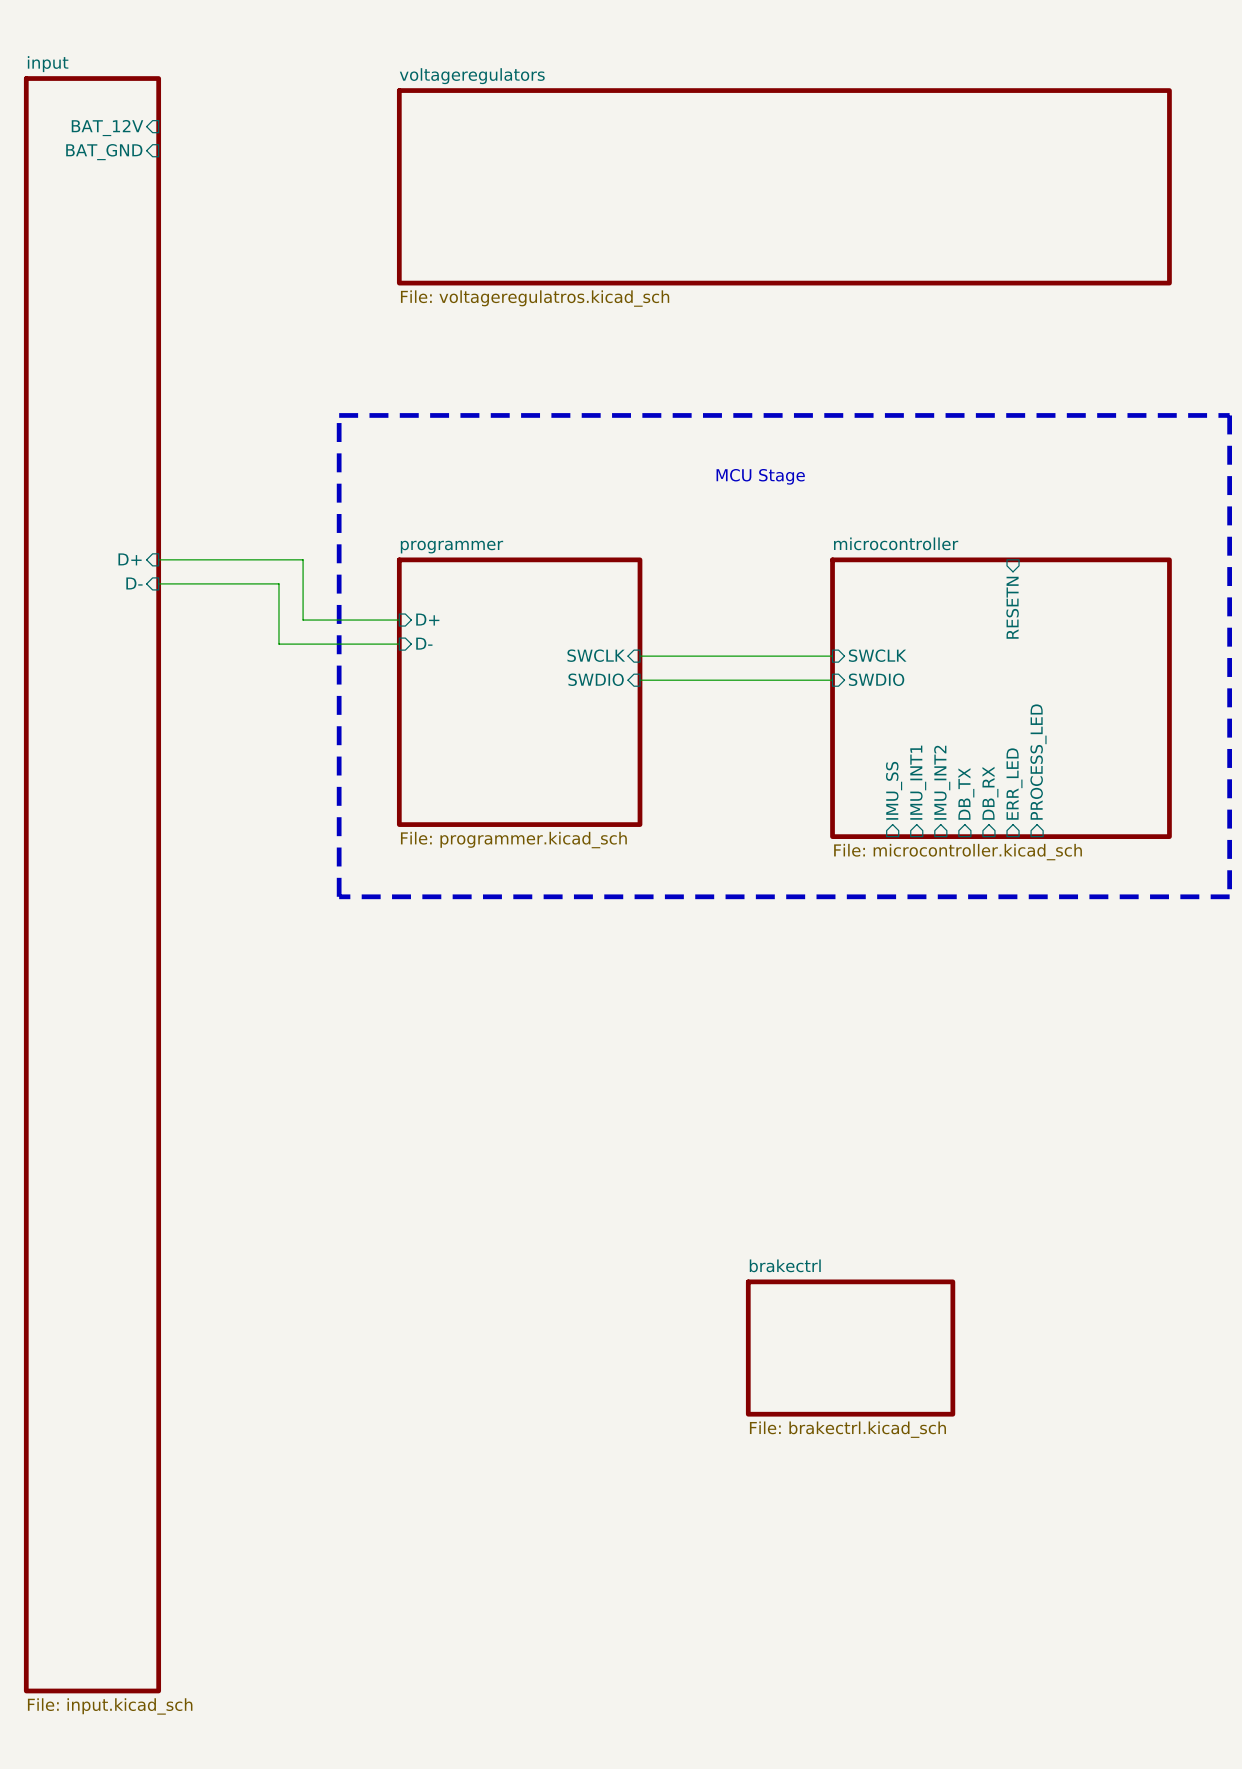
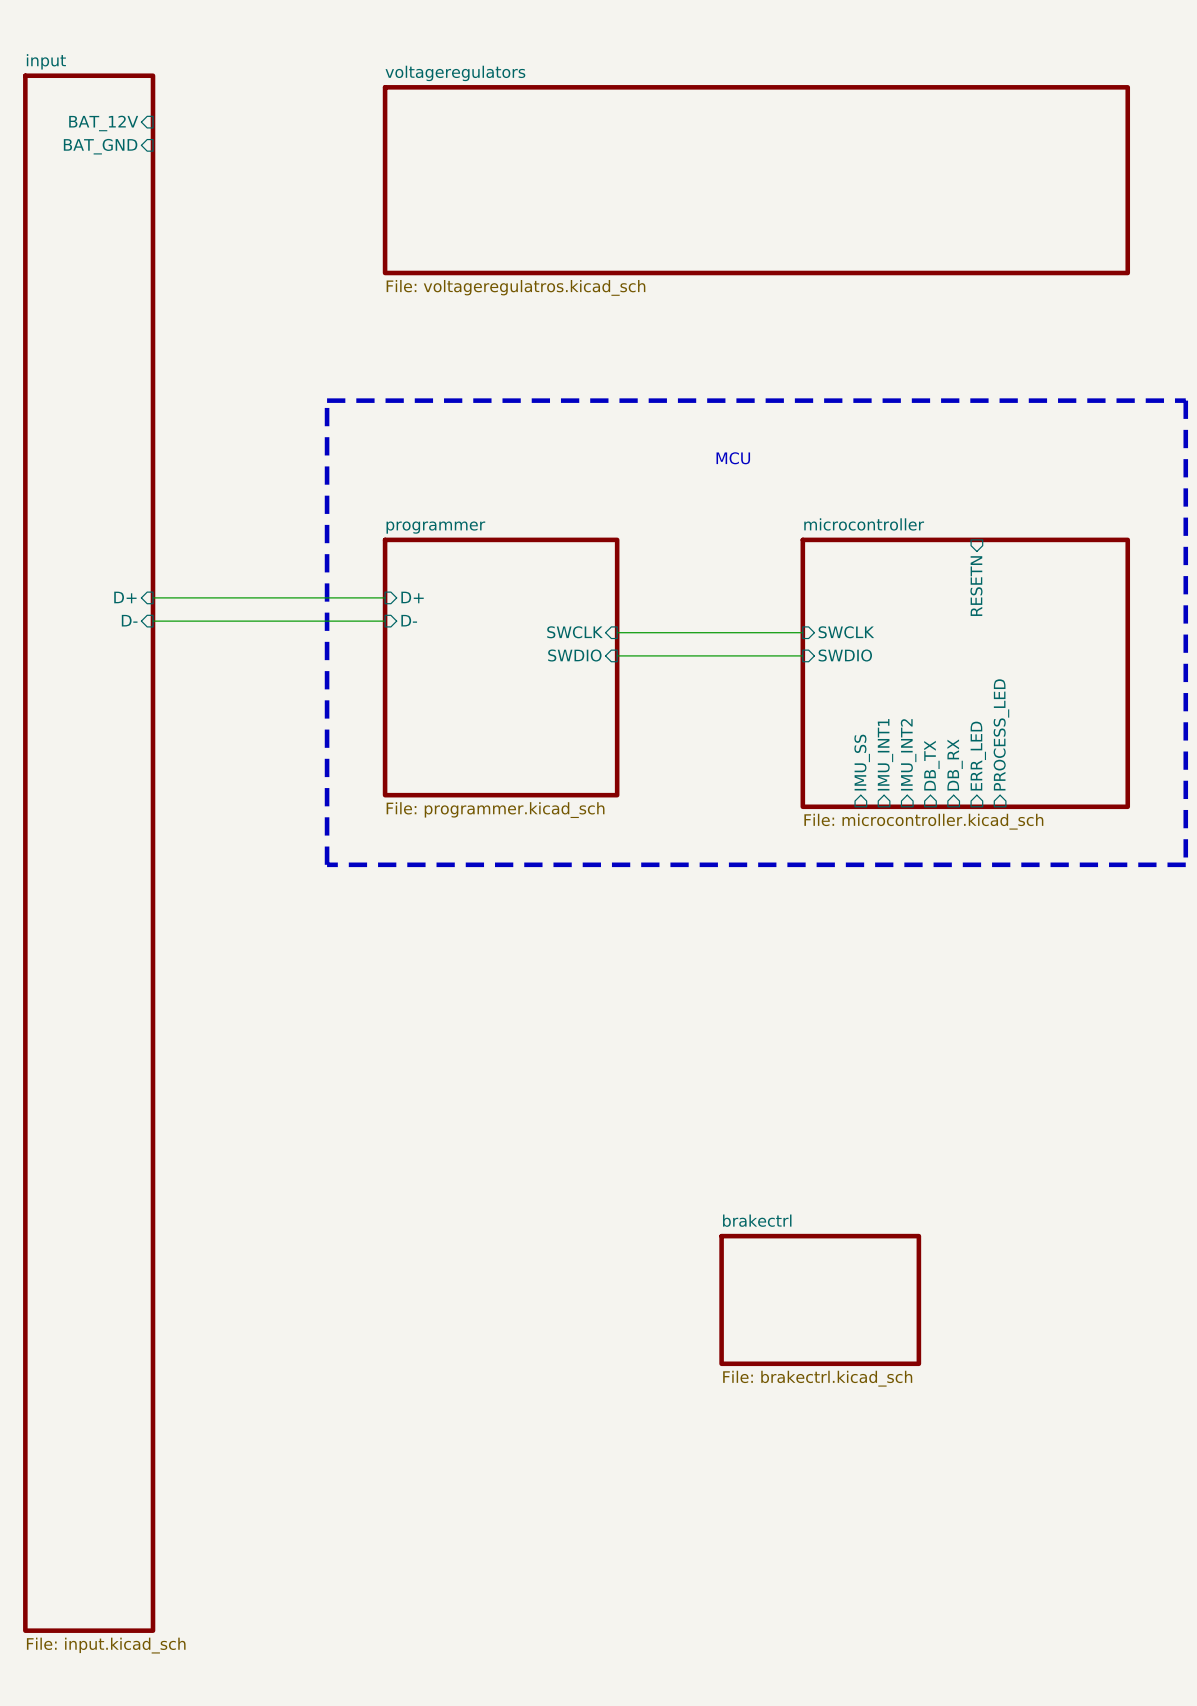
text: MCU Stage (760, 476) -> MCU (733, 458)
sheet pin position: D+ (130, 559) -> D+ (125, 597)
wire: (158, 559) (303, 559) (303, 620) -> (153, 597) (292, 597)
sheet pin position: D- (134, 583) -> D- (129, 620)
wire: (158, 583) (278, 583) (278, 644) -> (153, 621) (269, 621)

